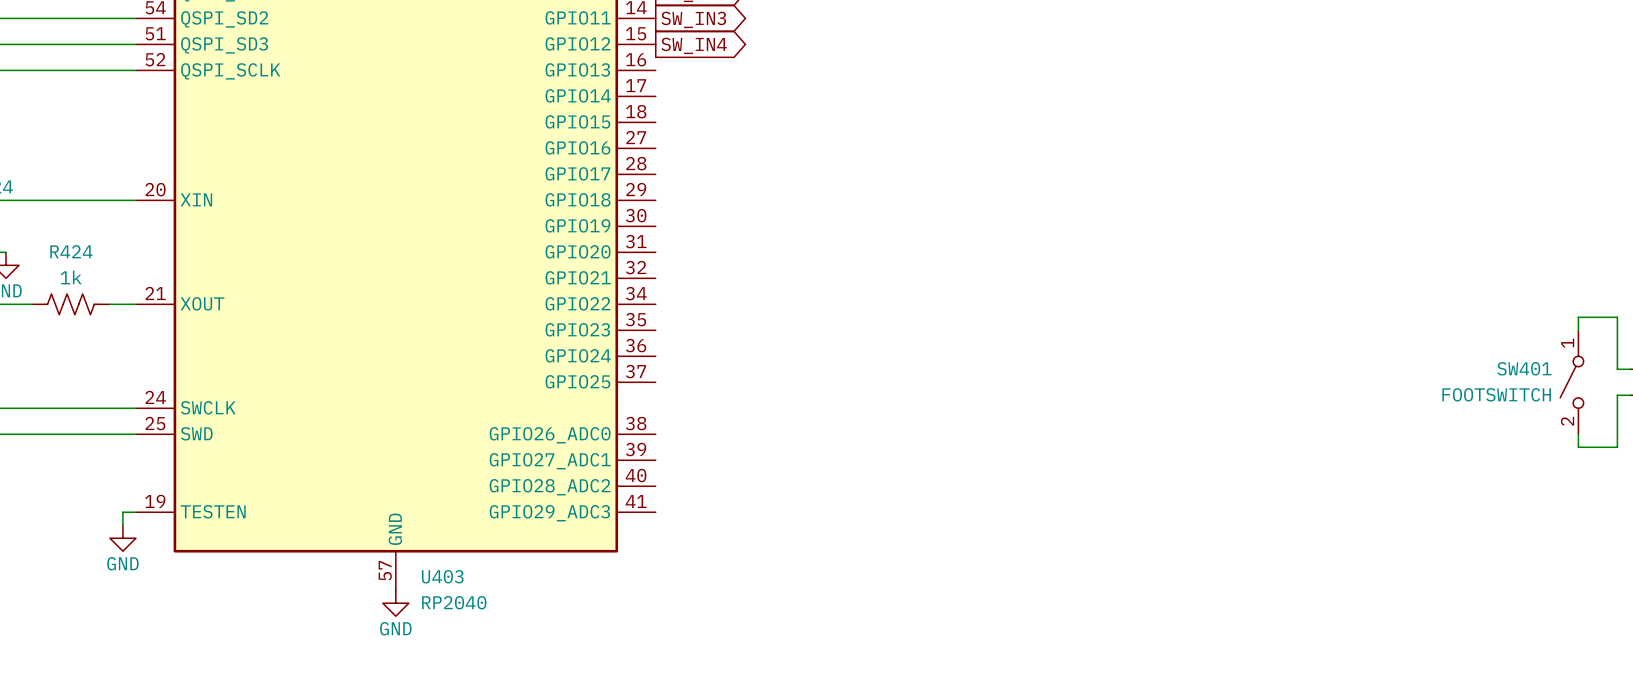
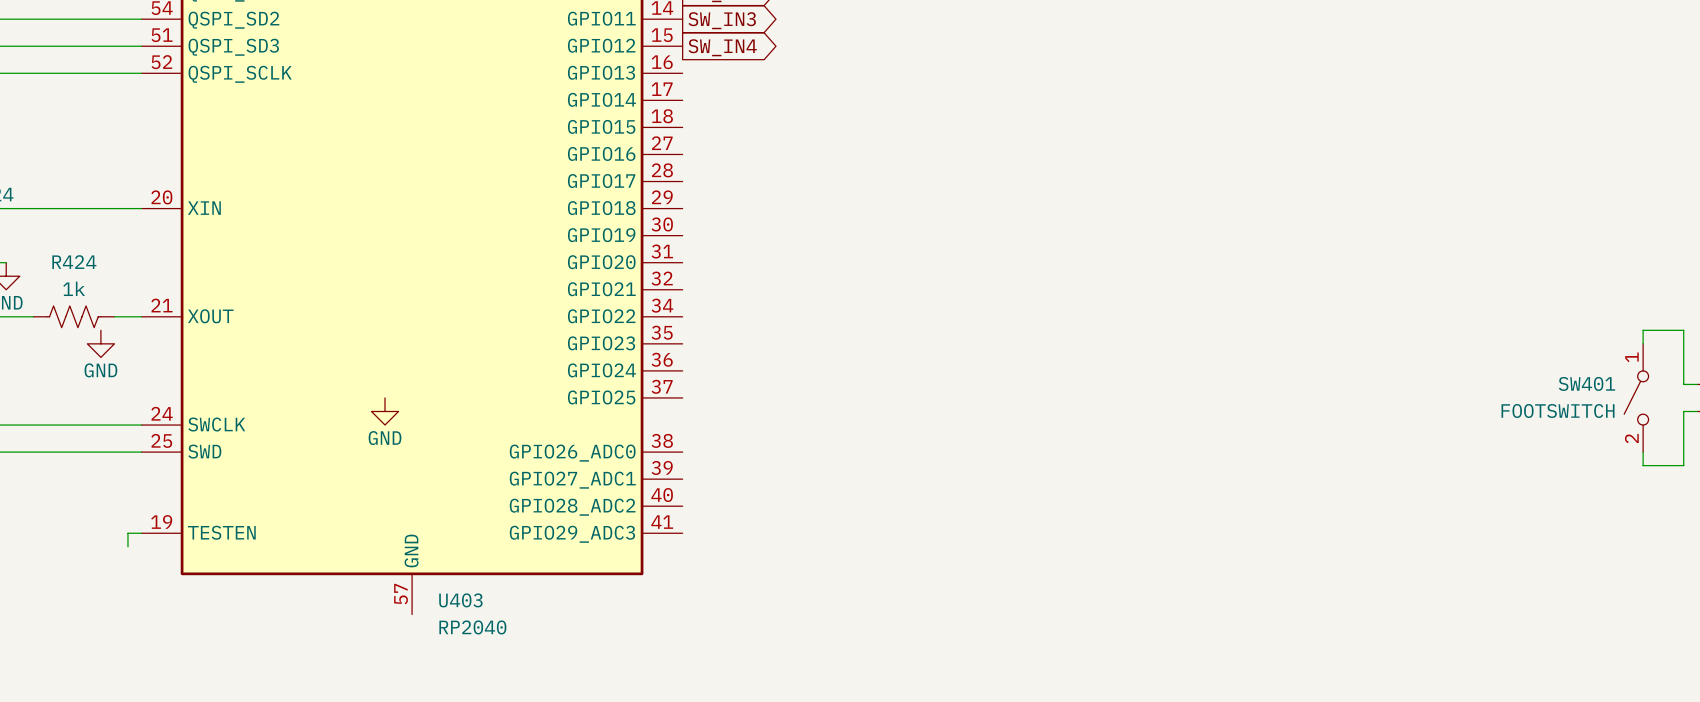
power symbol: none -> GND (100, 343)
power symbol: none -> GND (385, 411)
power symbol: GND (122, 538) -> none
power symbol: GND (395, 603) -> none

